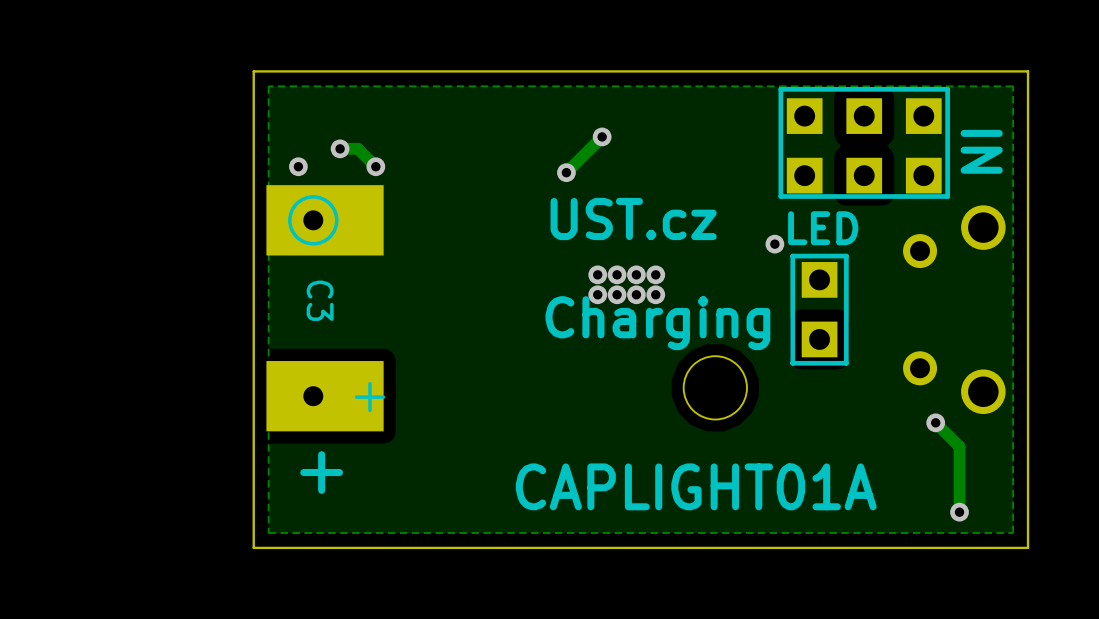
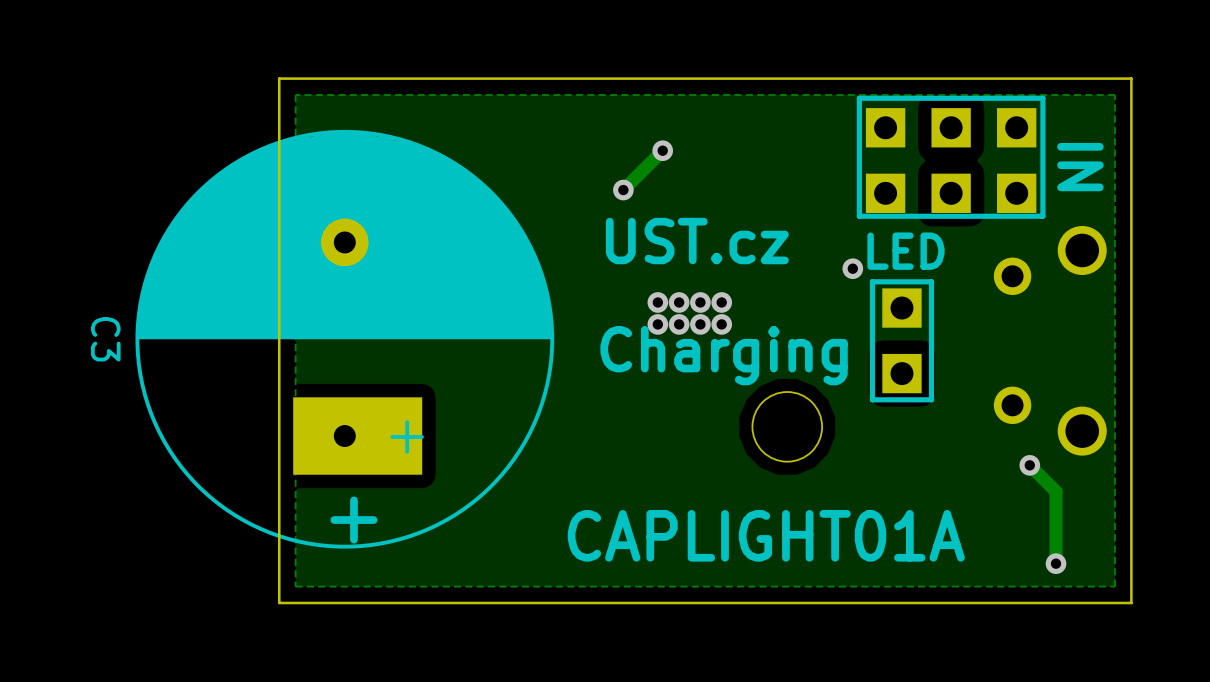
C3 footprint: [266, 185, 384, 432] -> [135, 129, 555, 549]
C3 name position: C3 (320, 300) -> C3 (105, 339)

